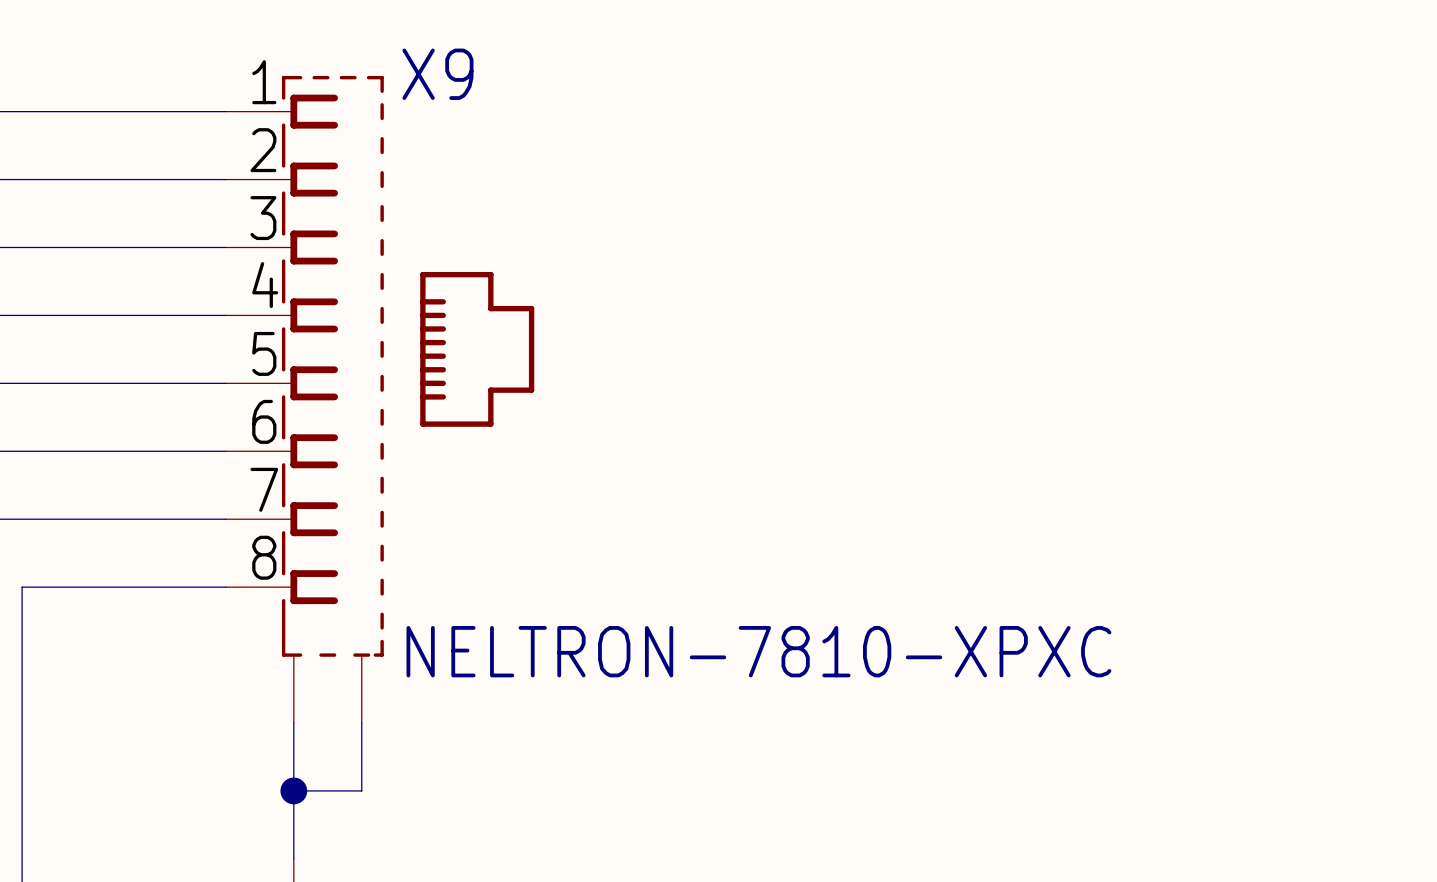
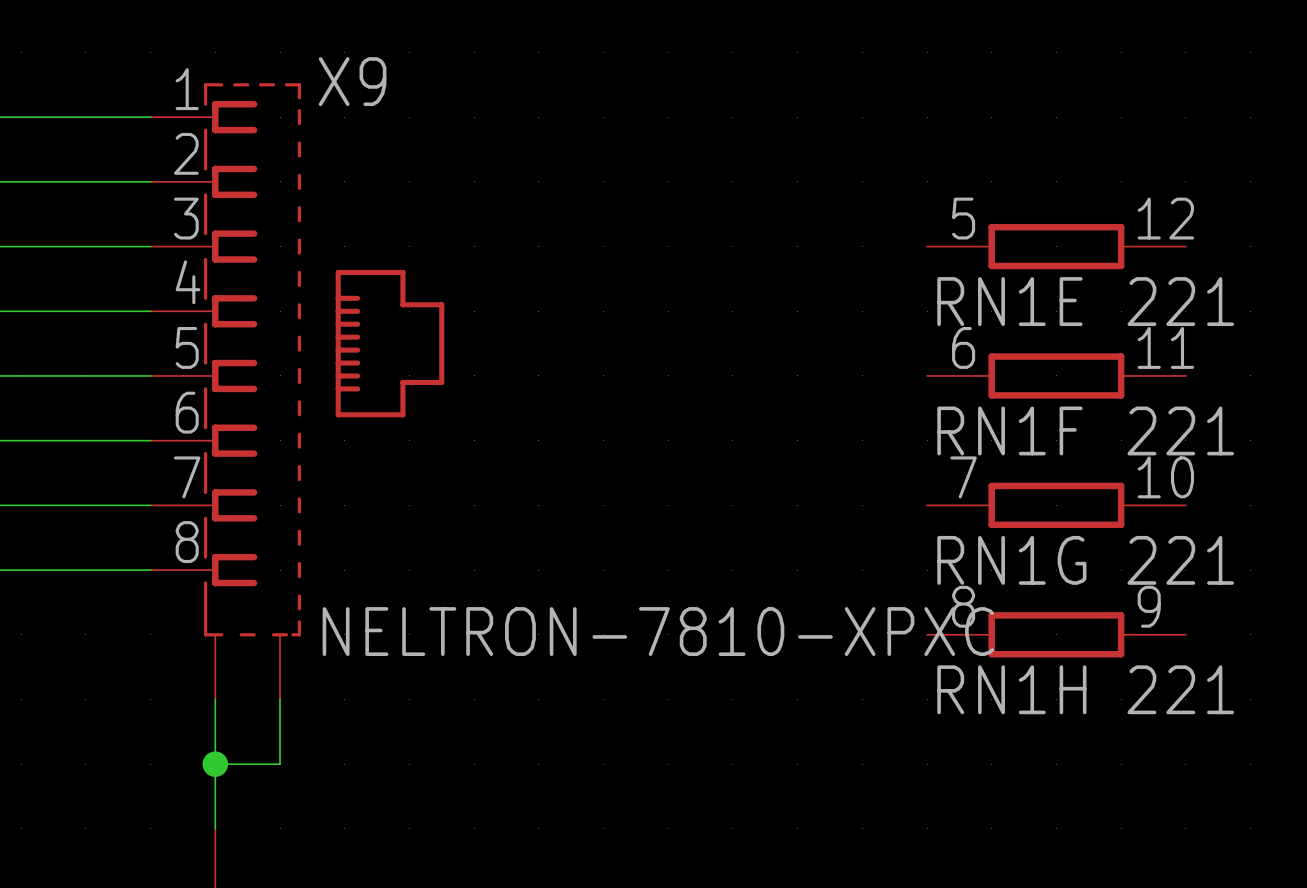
RN1E: none -> 221 (1056, 246)
RN1F: none -> 221 (1056, 375)
RN1G: none -> 221 (1056, 505)
RN1H: none -> 221 (1056, 634)

